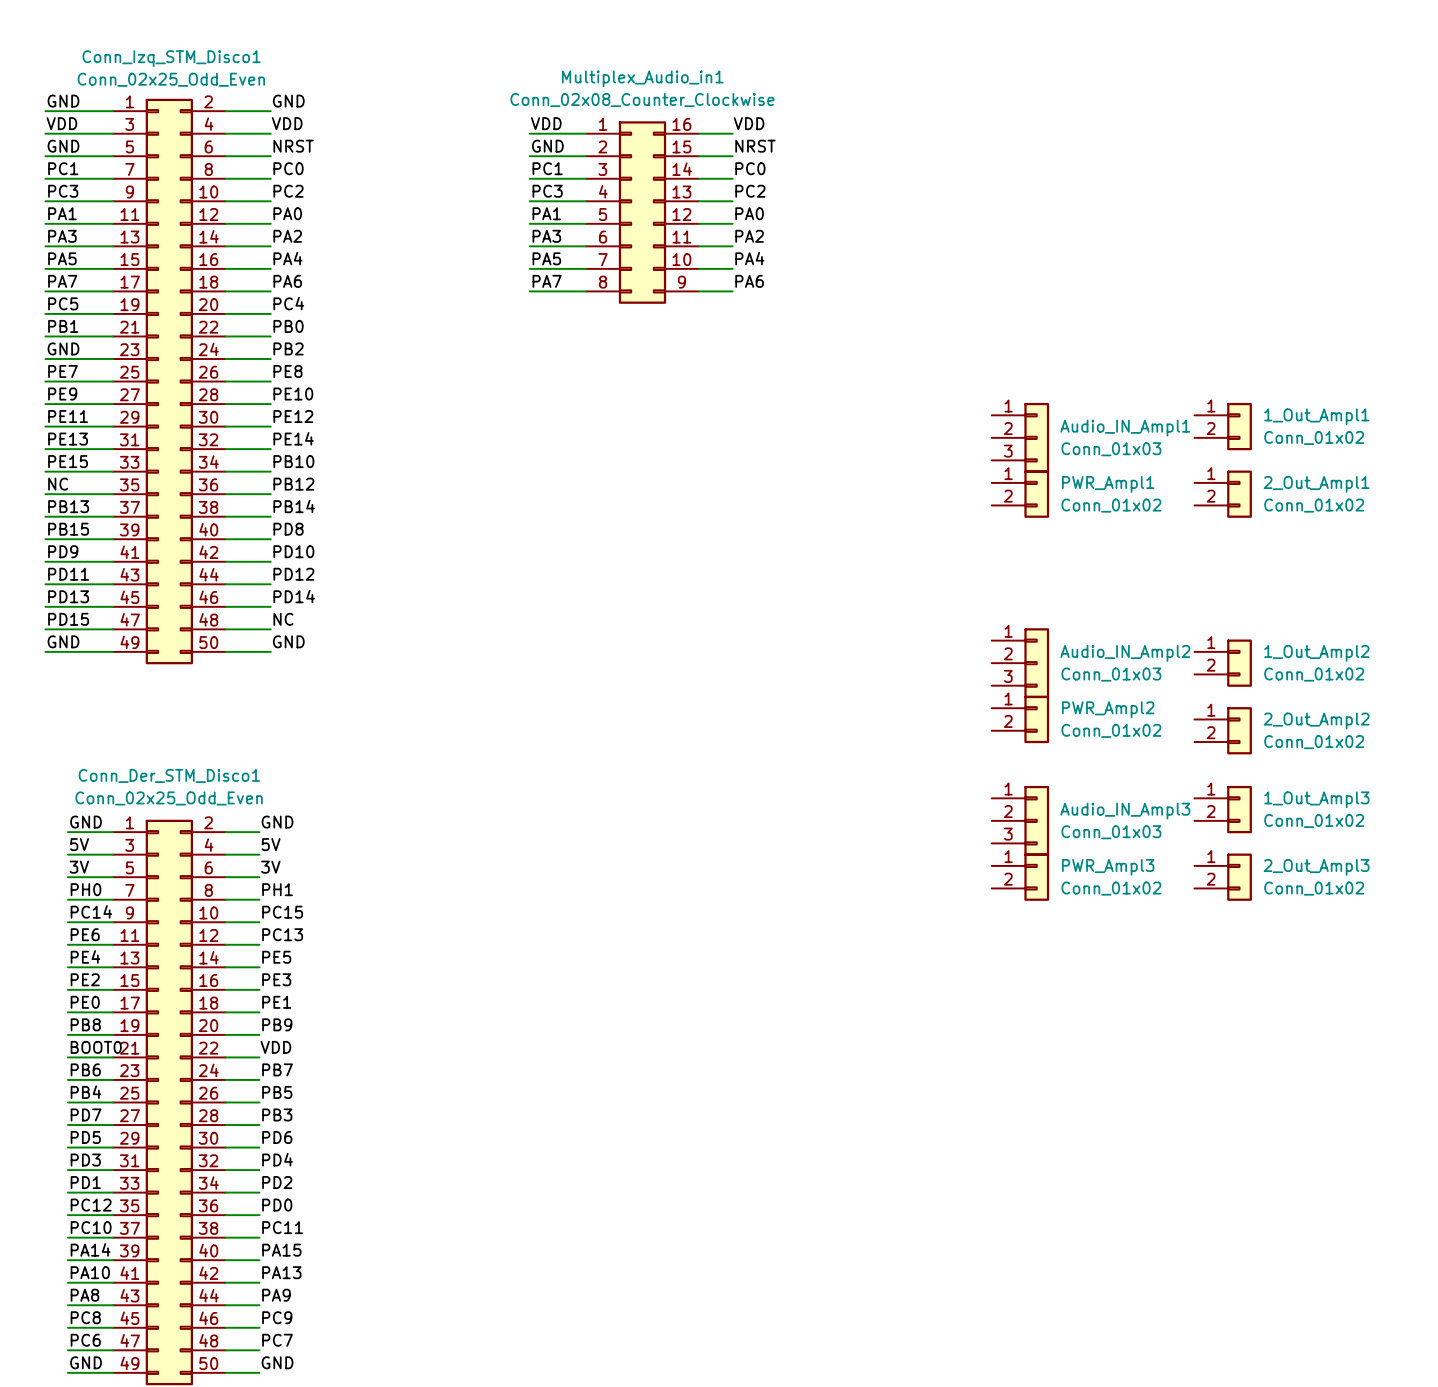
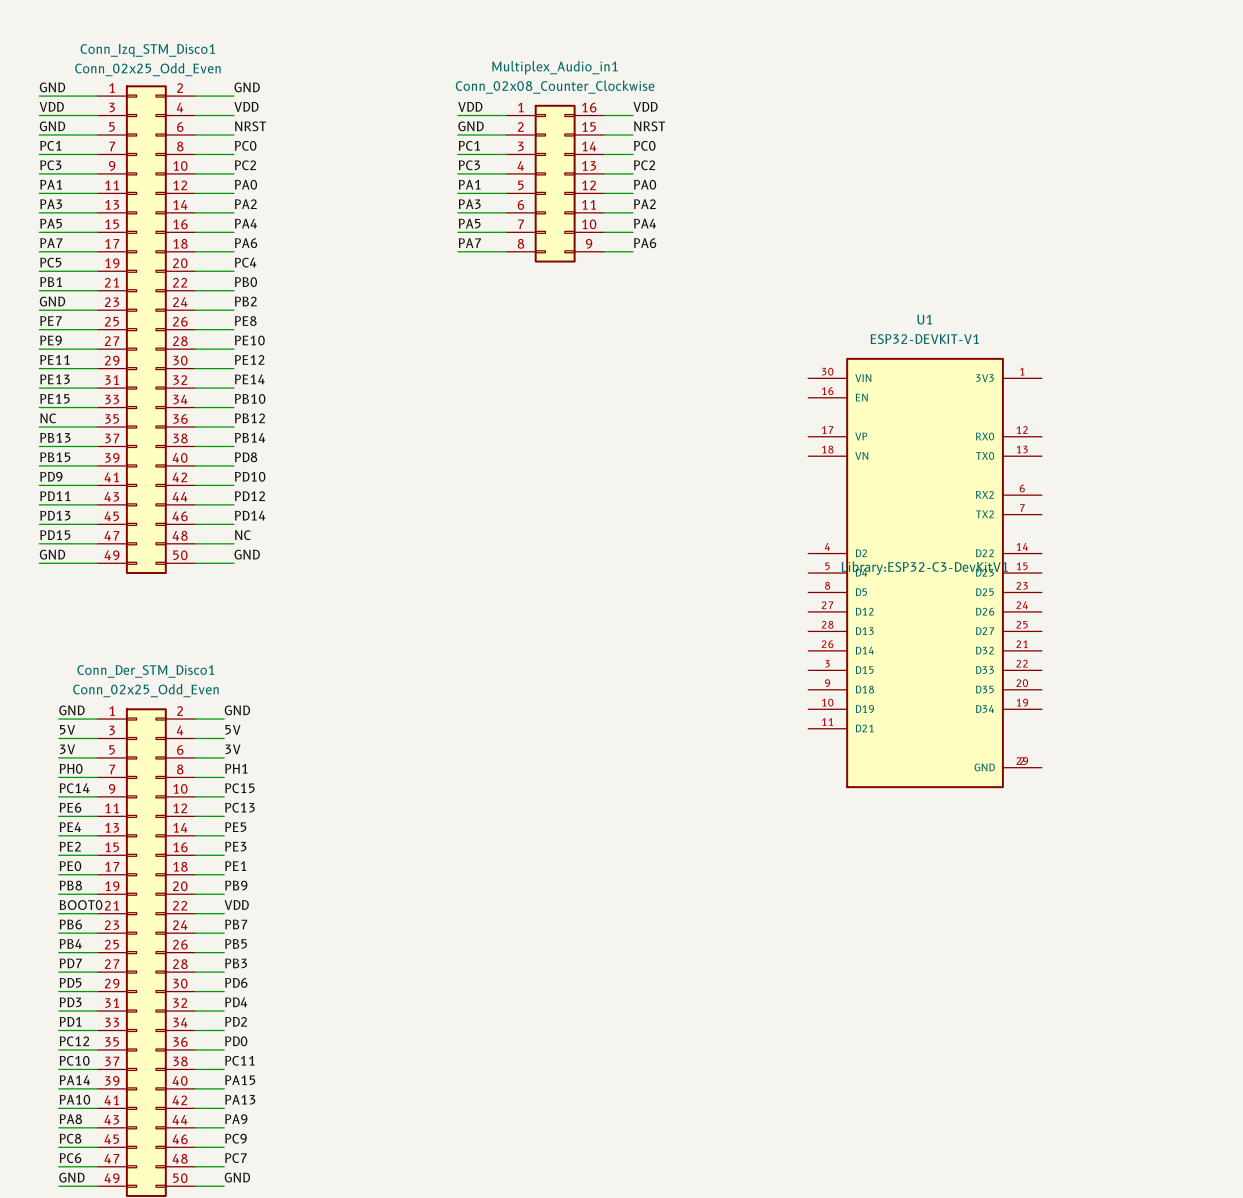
1_Out_Ampl1: Conn_01x02 (1223, 426) -> none
Audio_IN_Ampl1: Conn_01x03 (1020, 437) -> none
PWR_Ampl1: Conn_01x02 (1020, 494) -> none
2_Out_Ampl1: Conn_01x02 (1223, 494) -> none
Audio_IN_Ampl2: Conn_01x03 (1020, 663) -> none
U1: none -> ESP32-DEVKIT-V1 (925, 573)
1_Out_Ampl2: Conn_01x02 (1223, 663) -> none
PWR_Ampl2: Conn_01x02 (1020, 719) -> none
2_Out_Ampl2: Conn_01x02 (1223, 730) -> none
1_Out_Ampl3: Conn_01x02 (1223, 809) -> none
Audio_IN_Ampl3: Conn_01x03 (1020, 820) -> none
PWR_Ampl3: Conn_01x02 (1020, 877) -> none
2_Out_Ampl3: Conn_01x02 (1223, 877) -> none

